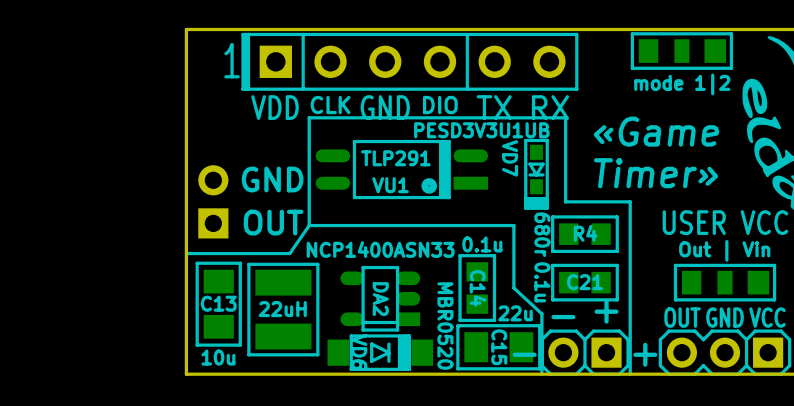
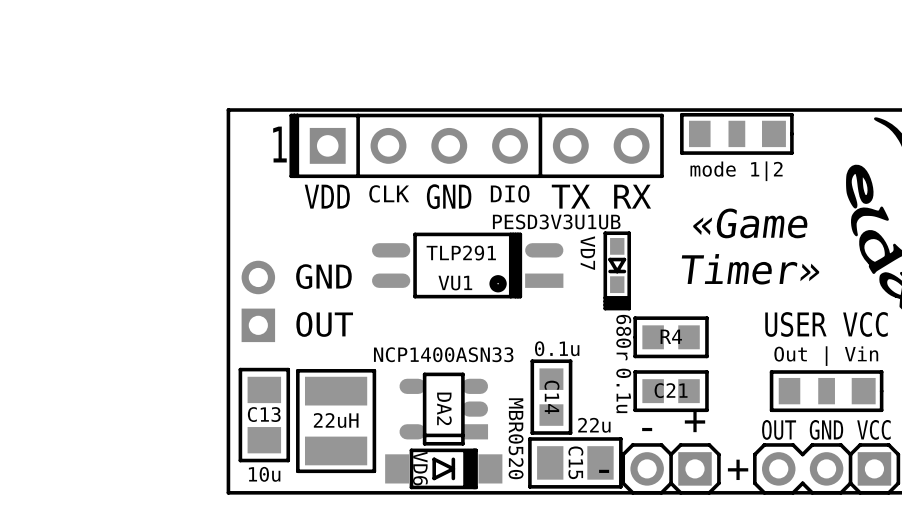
part position: (681, 51) -> (736, 133)
line: (309, 225) (289, 253) (186, 253) -> none
line: (309, 225) (513, 225) (513, 288) (541, 313) (541, 374) -> none
line: (309, 225) (309, 117) (565, 117) (565, 201) (630, 201) (630, 374) -> none

